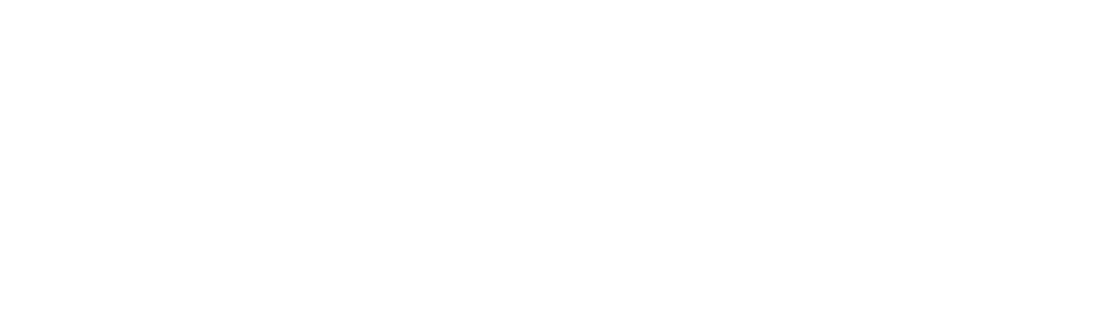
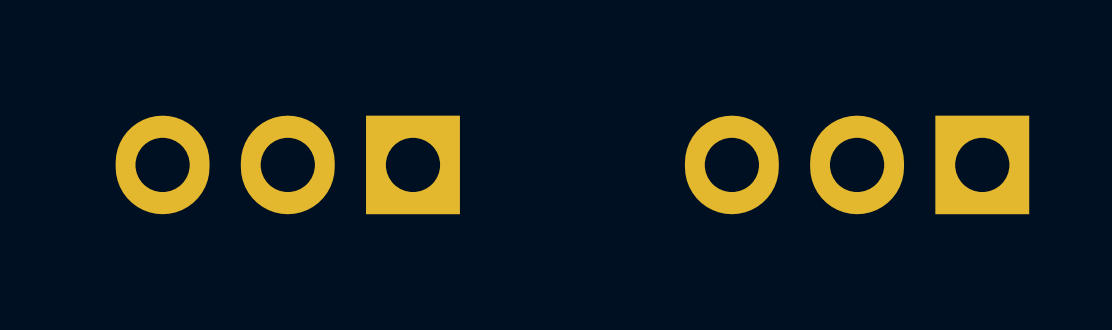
part: none -> (287, 164)
part: none -> (857, 164)

